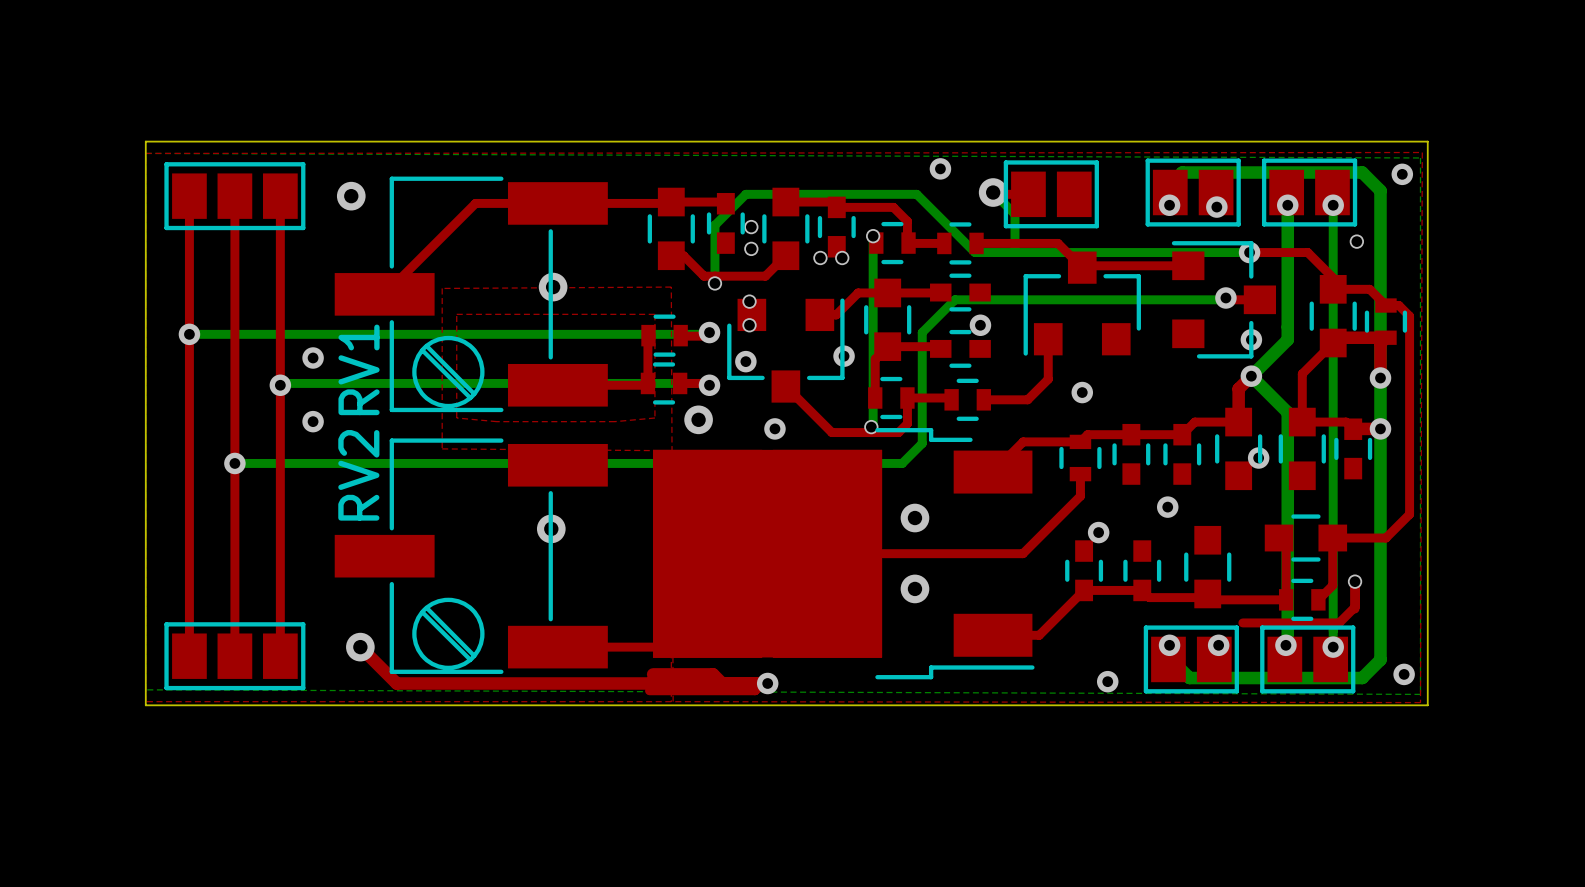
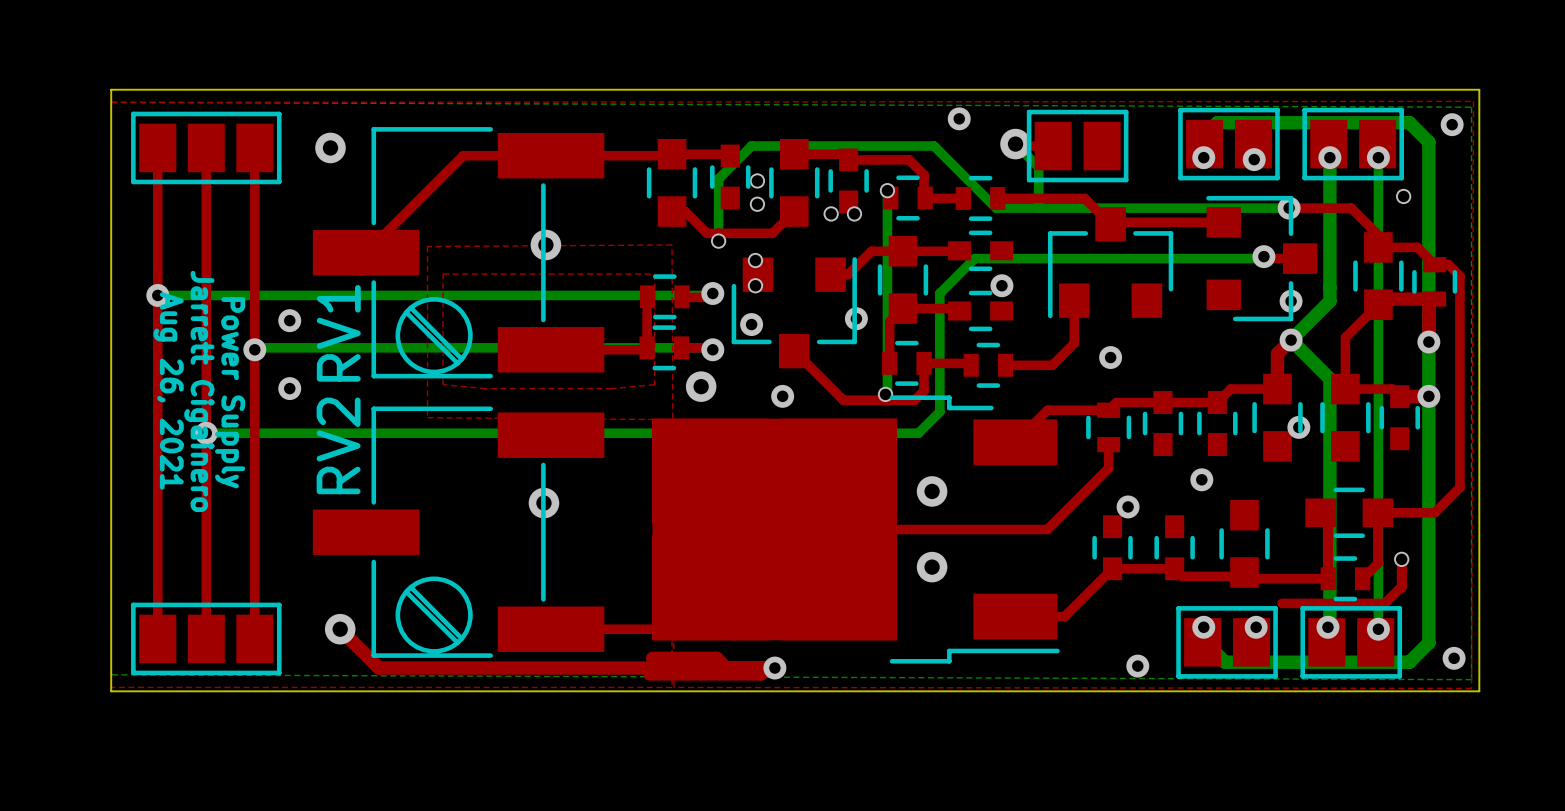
text: none -> Aug 26, 2021 (168, 390)
text: none -> Jarrett Cigainero (199, 391)
text: none -> Power Supply (230, 392)

